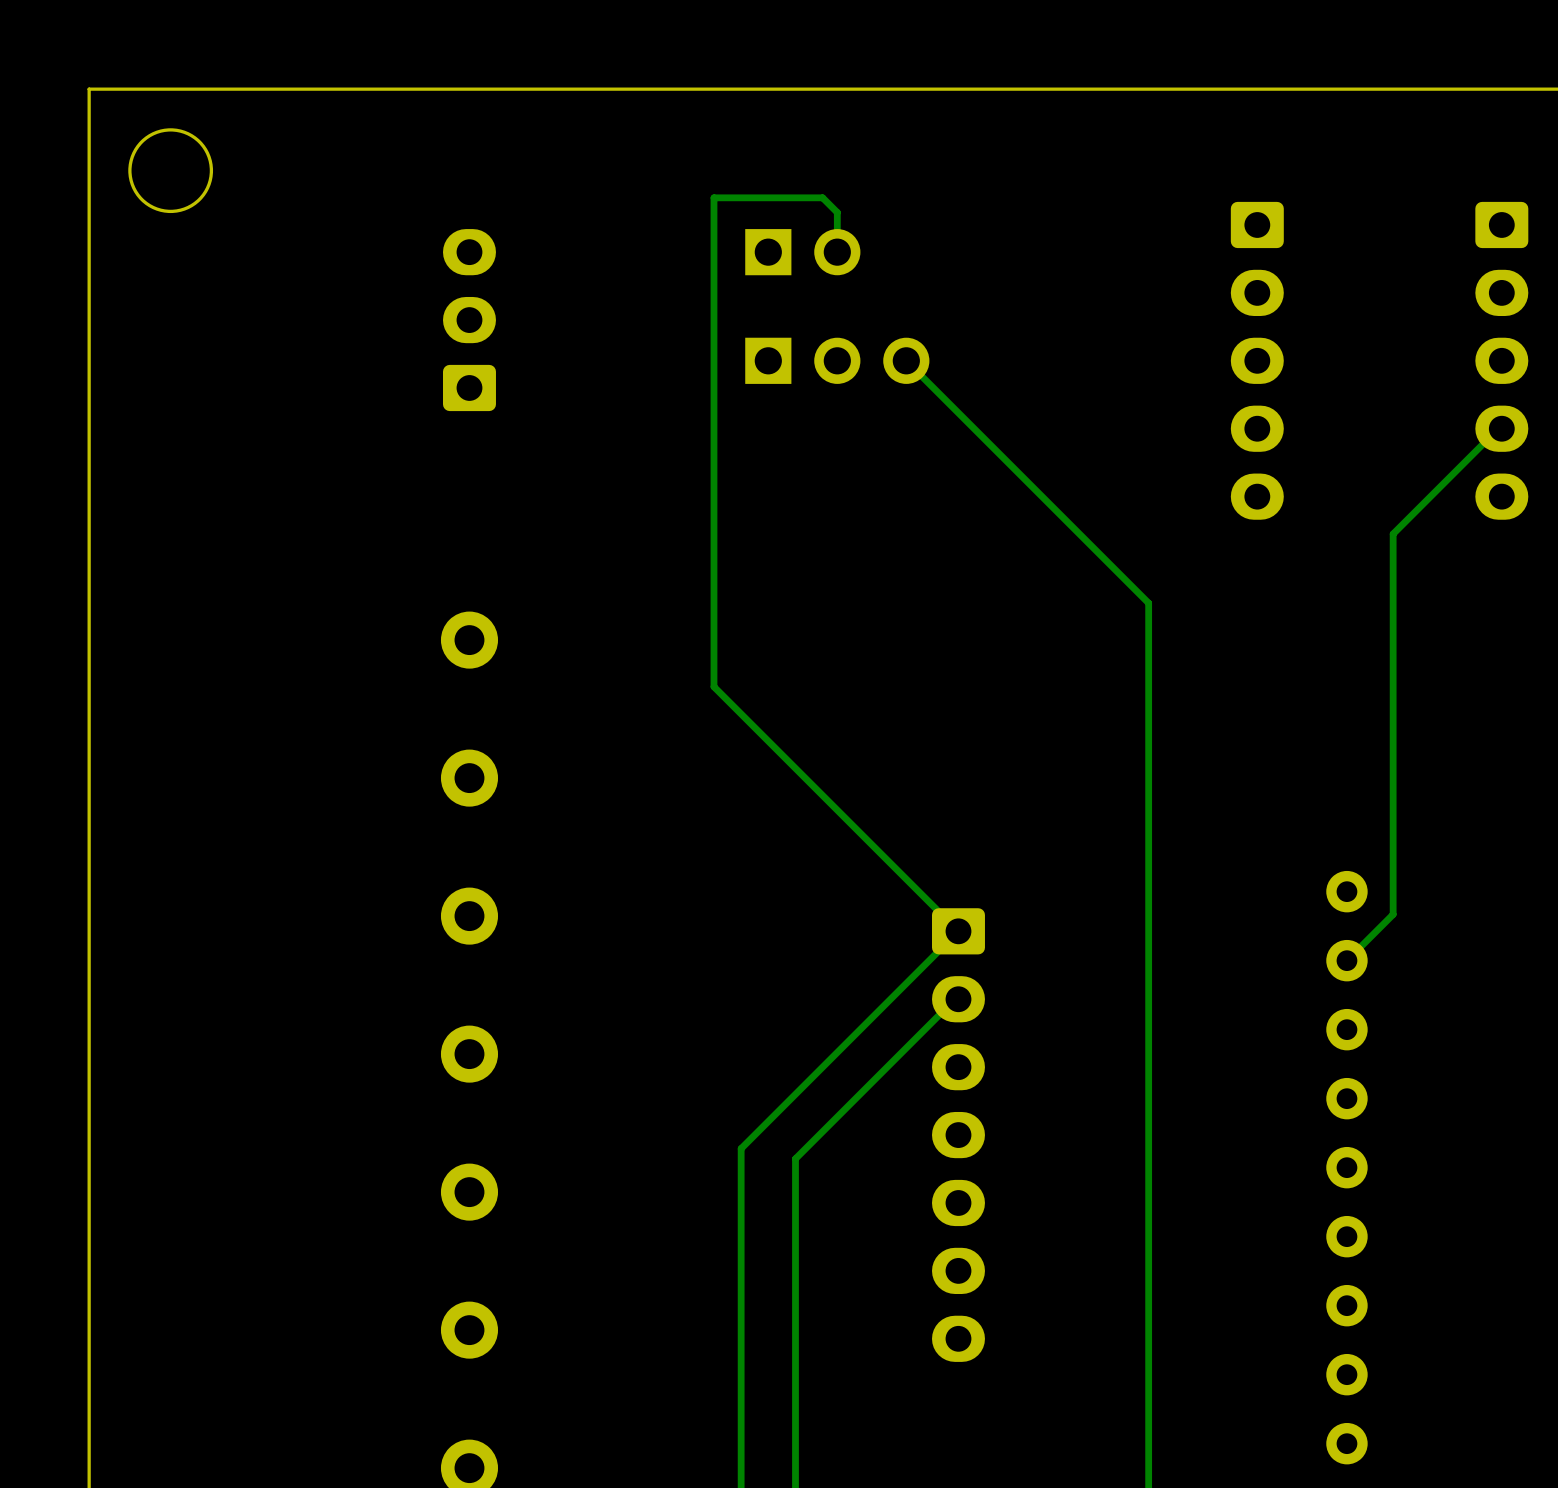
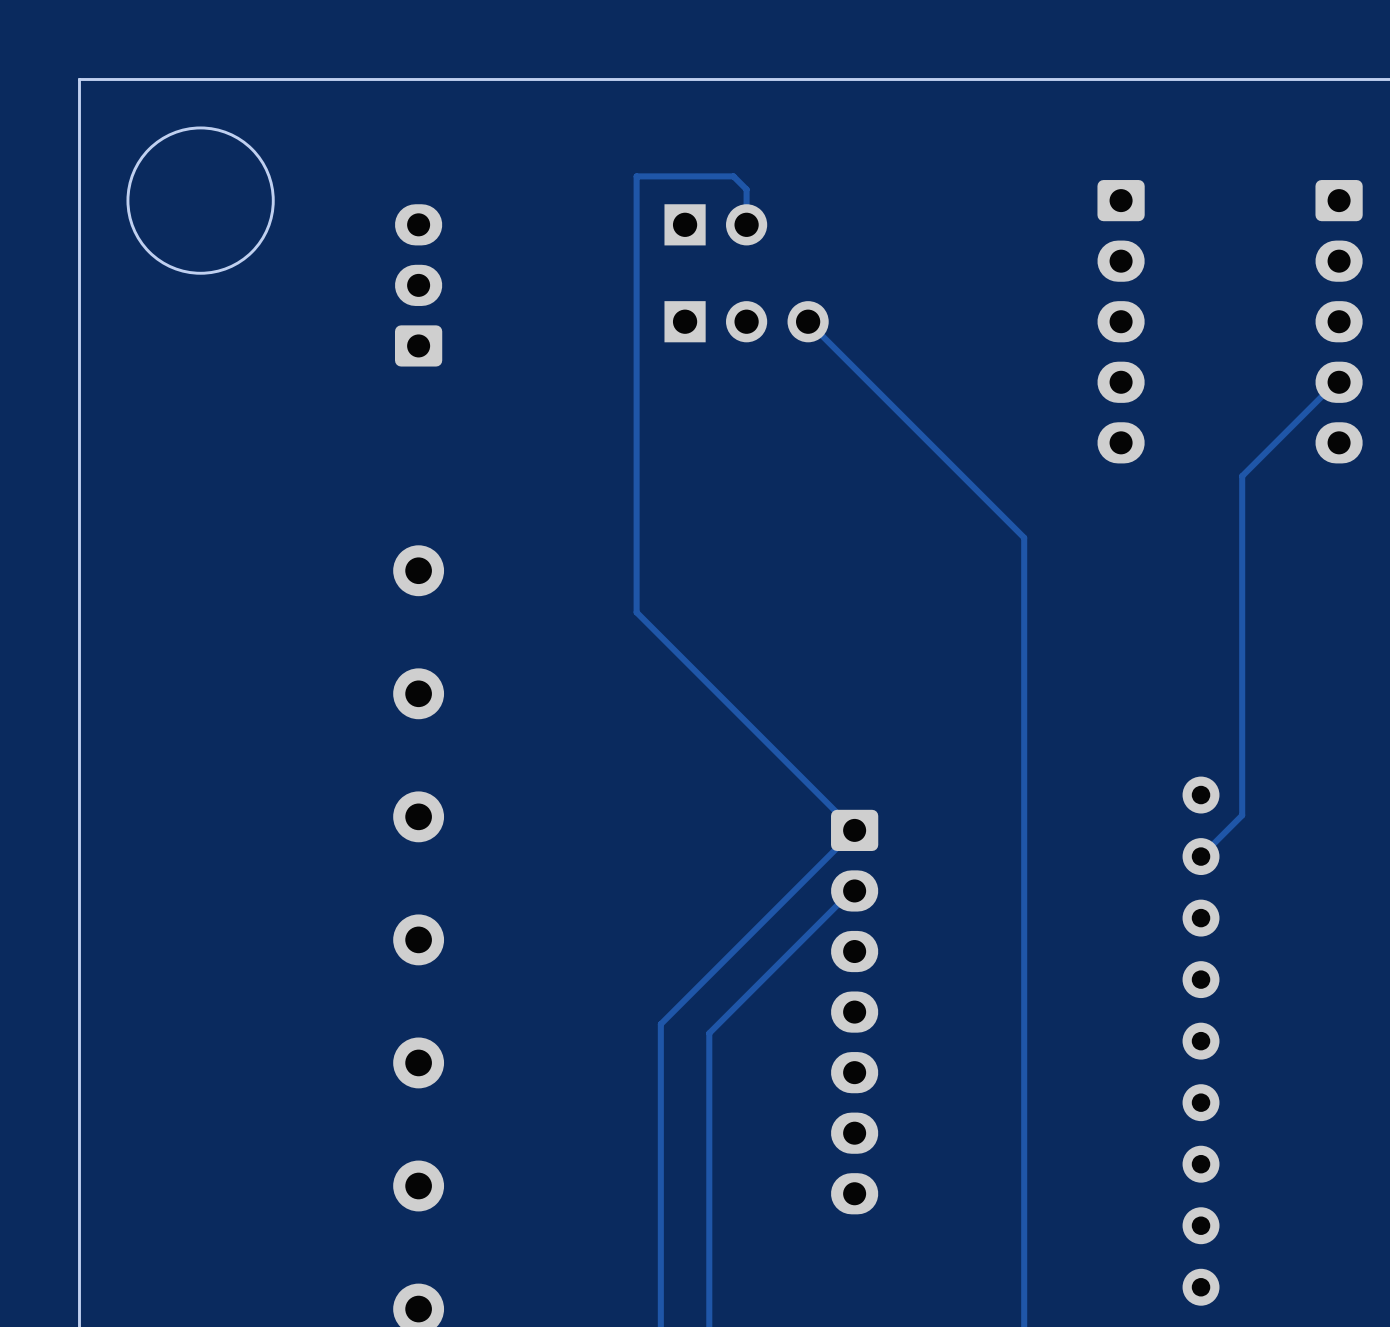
round board edge: [128, 128, 214, 214] -> none
round board edge: none -> [126, 126, 275, 275]

